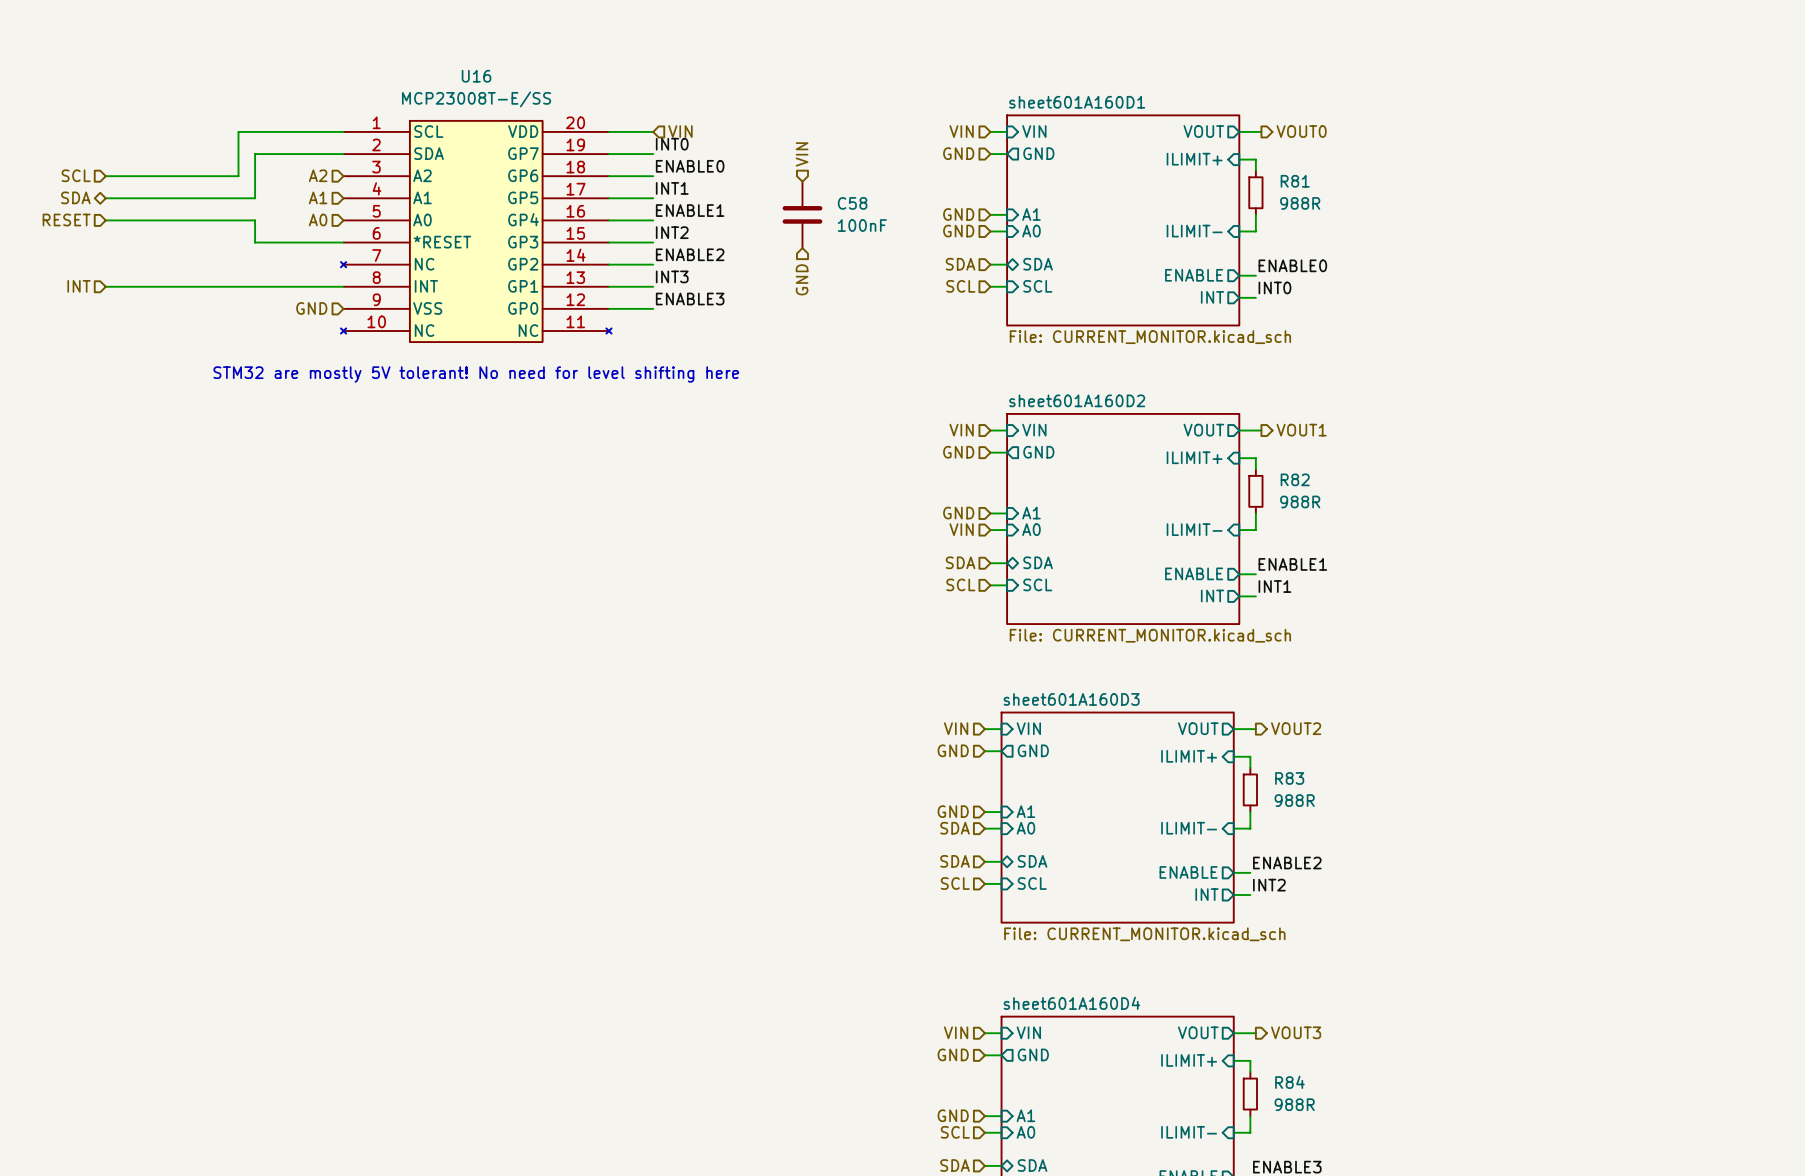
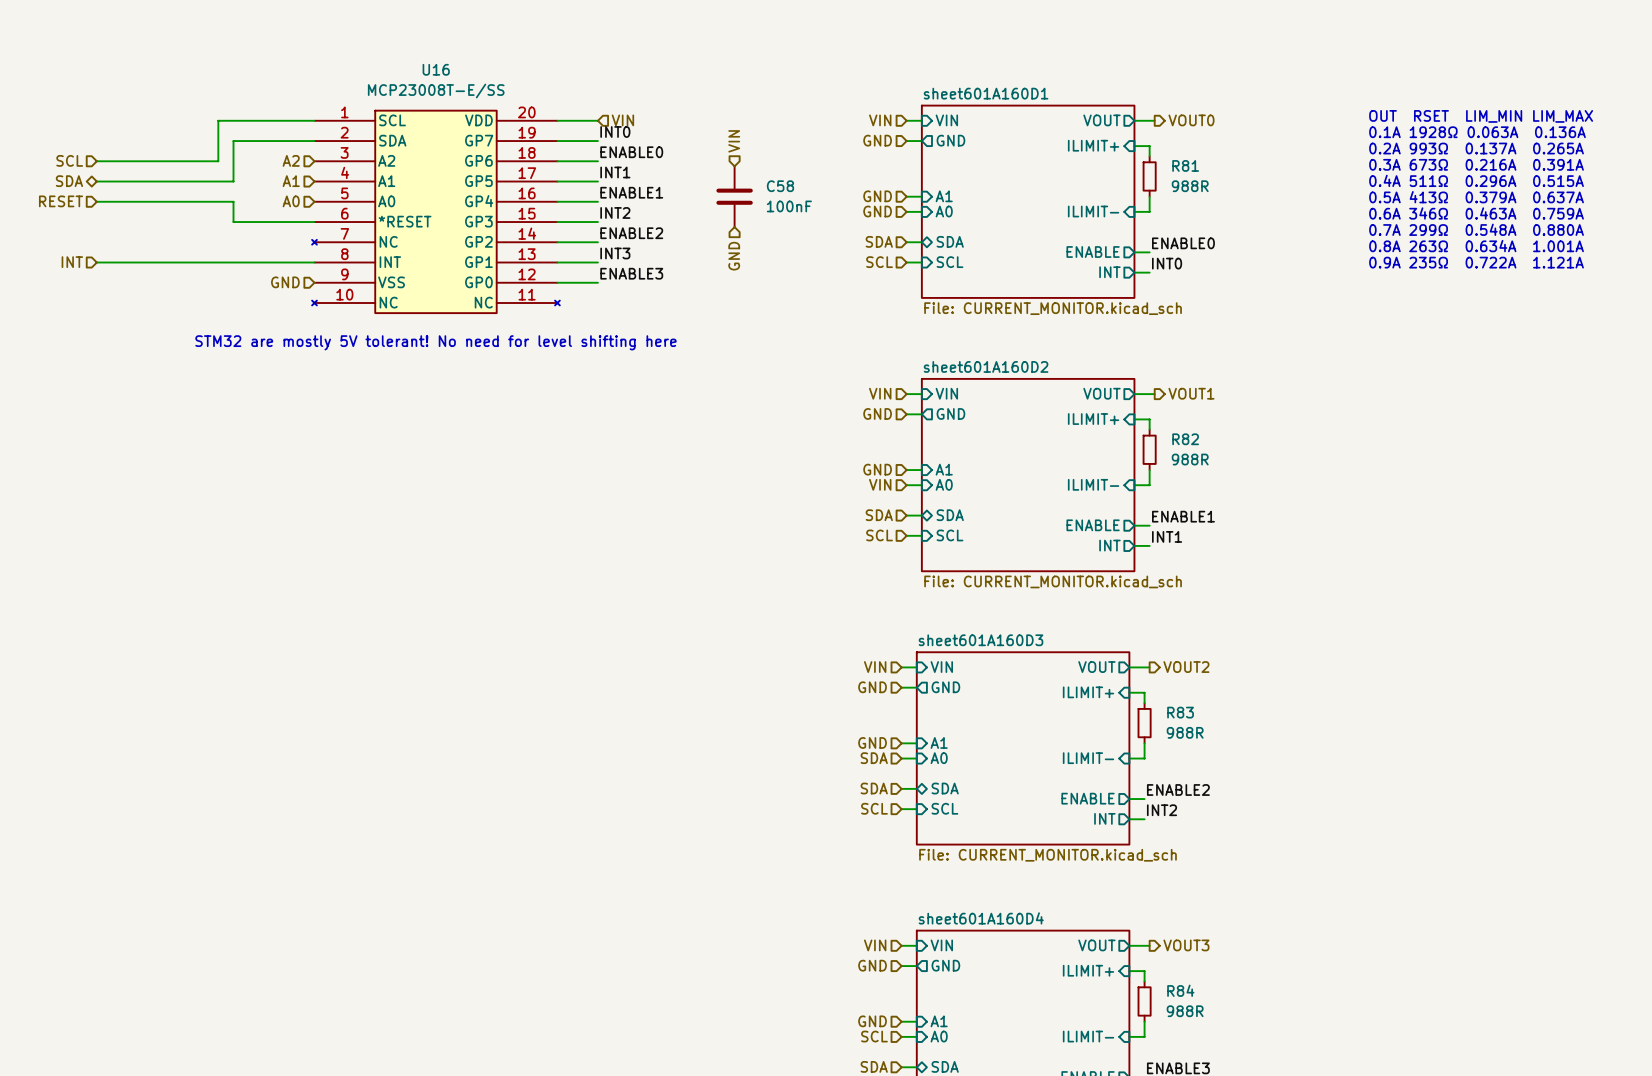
text: none -> OUT RSET LIM_MIN LIM_MAX (1481, 116)
text: none -> 0.1A 1928Ω 0.063A 0.136A (1477, 132)
text: none -> 0.2A 993Ω 0.137A 0.265A (1476, 148)
text: none -> 0.3A 673Ω 0.216A 0.391A (1476, 164)
text: none -> 0.4A 511Ω 0.296A 0.515A (1476, 180)
text: none -> 0.5A 413Ω 0.379A 0.637A (1476, 197)
text: none -> 0.6A 346Ω 0.463A 0.759A (1476, 213)
text: none -> 0.7A 299Ω 0.548A 0.880A (1476, 229)
text: none -> 0.8A 263Ω 0.634A 1.001A (1476, 246)
text: none -> 0.9A 235Ω 0.722A 1.121A (1476, 262)

